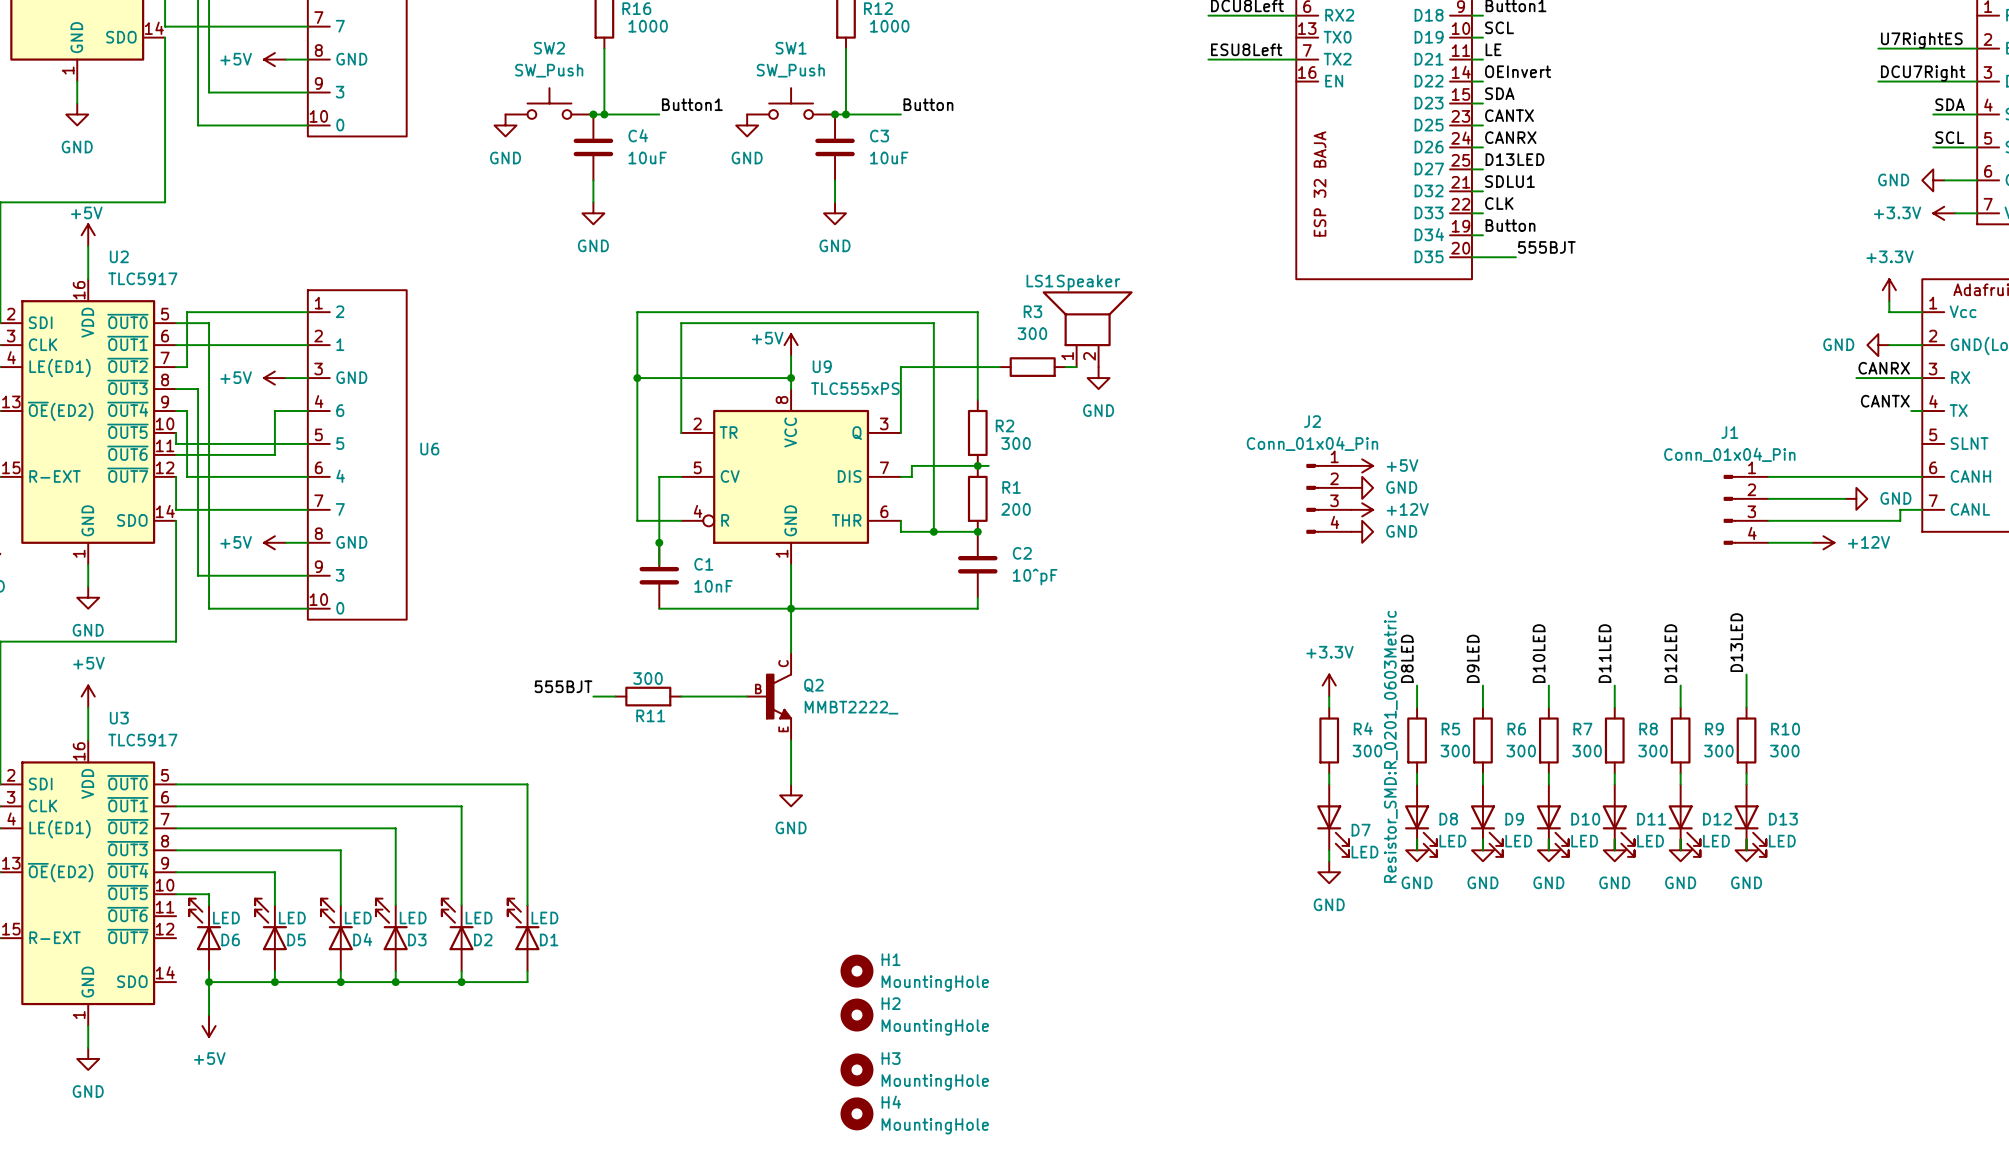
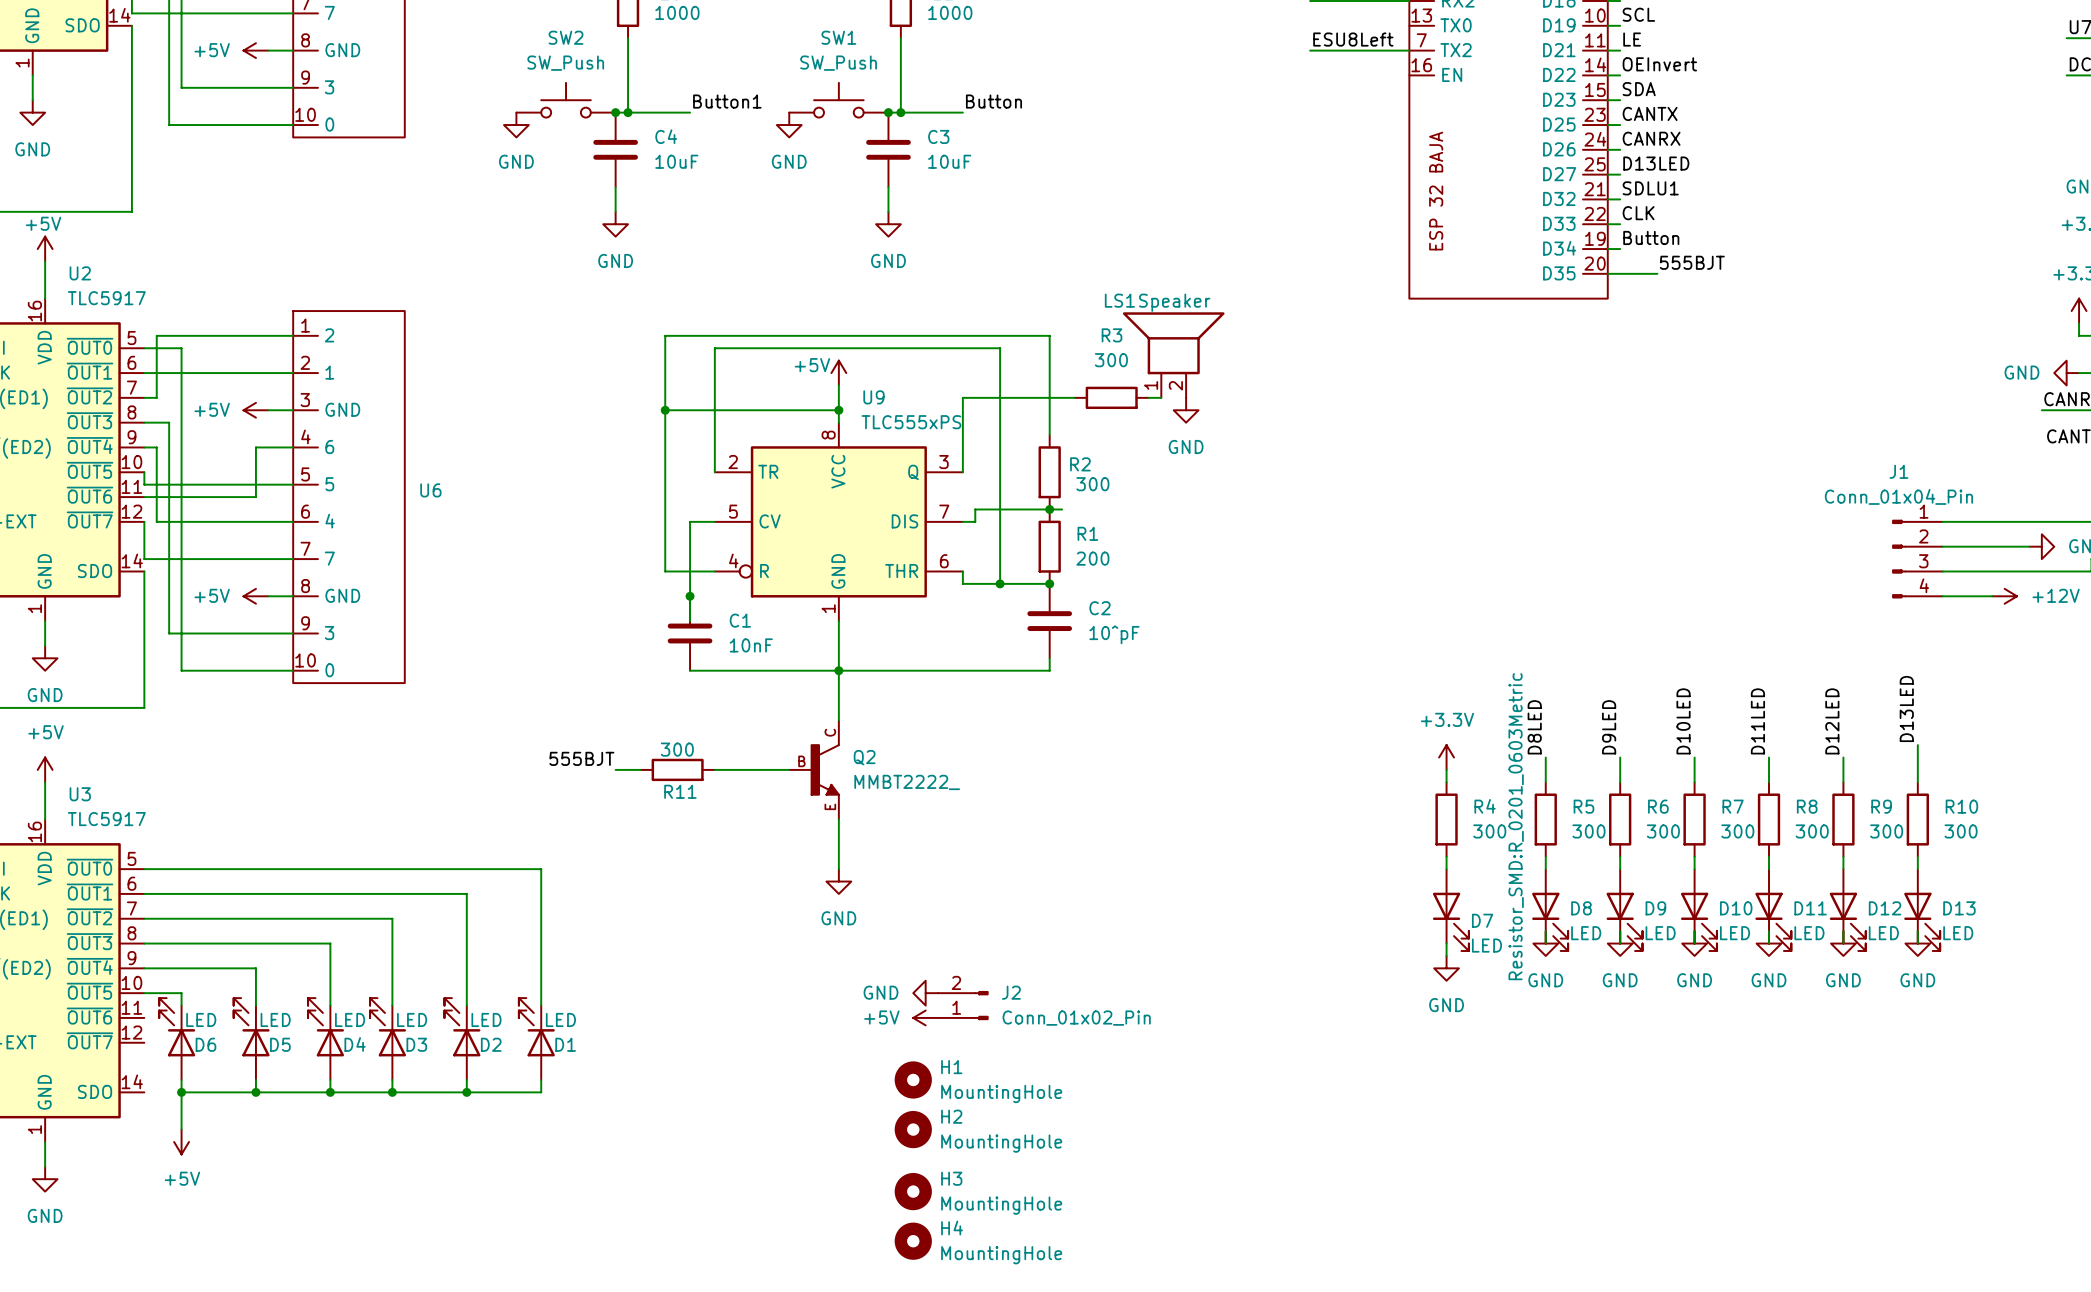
J2 name position: J2 (1312, 421) -> J2 (1011, 992)
J2 value: Conn_01x04_Pin (1312, 443) -> Conn_01x02_Pin (1076, 1018)
J2 symbol: [1306, 464, 1352, 534] -> [938, 991, 989, 1020]
power symbol: +5V (1362, 465) -> none
power symbol: GND (1362, 487) -> none
power symbol: +12V (1362, 509) -> none
power symbol: GND (1362, 531) -> none
power symbol: none -> GND (925, 993)
power symbol: none -> +5V (925, 1017)

